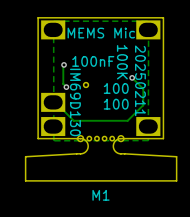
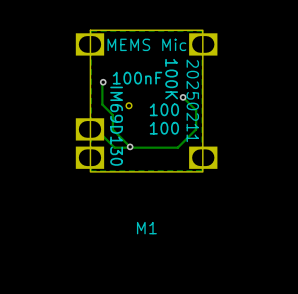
M1 footprint: [37, 17, 164, 155] -> [75, 29, 218, 173]
track: none -> (106, 108) (112, 115) (112, 129) (130, 146)
via position: (66, 87) -> (130, 146)
board edge: (124, 153) (176, 156) (176, 180) (25, 180) (25, 156) (76, 153) -> none

